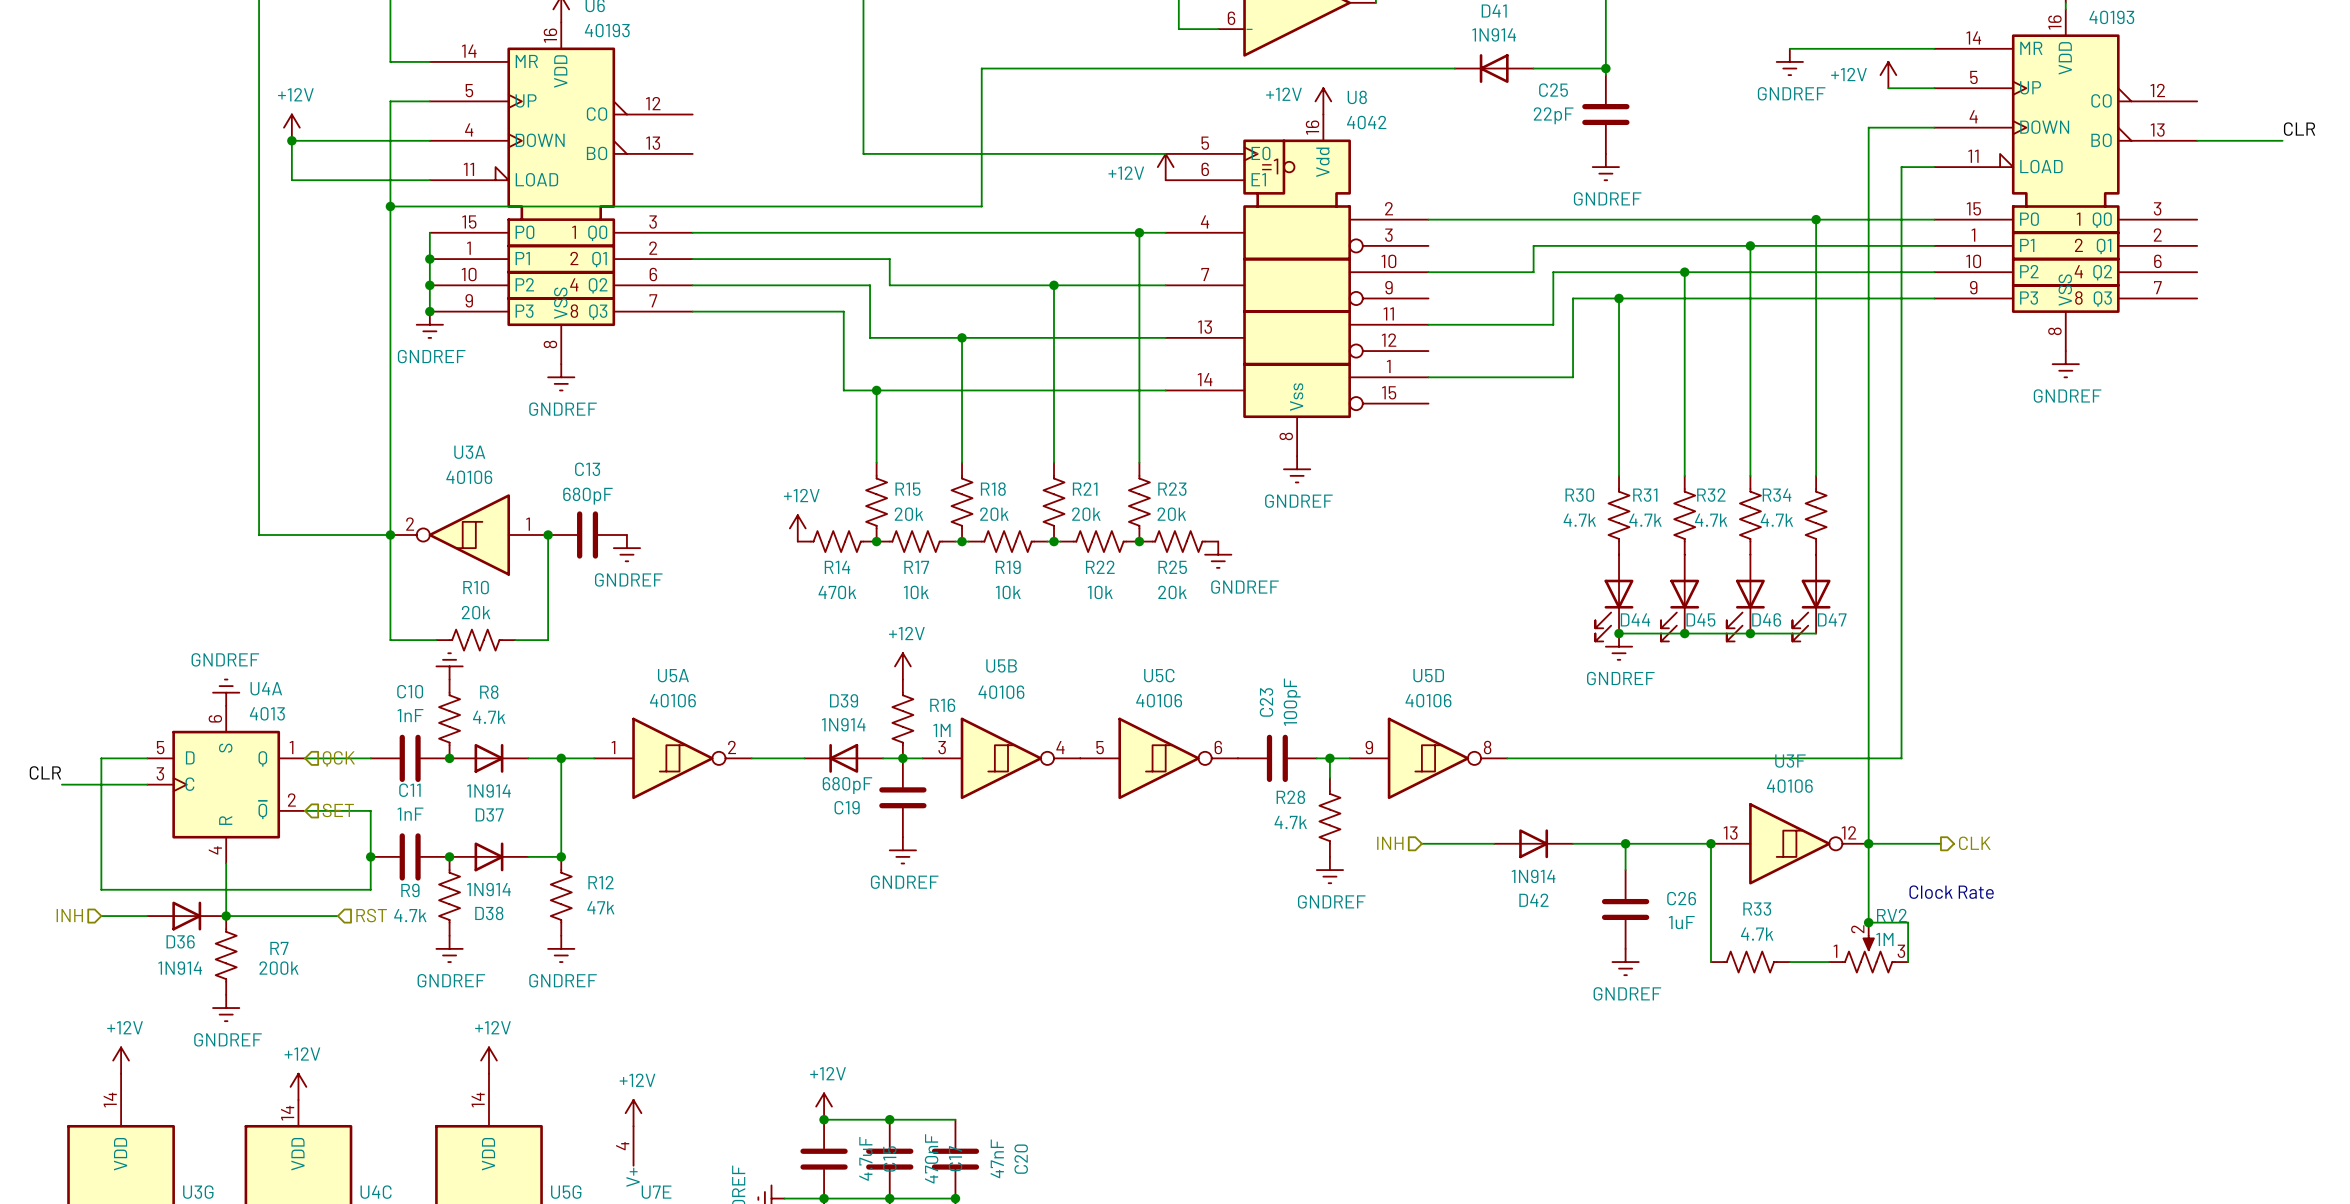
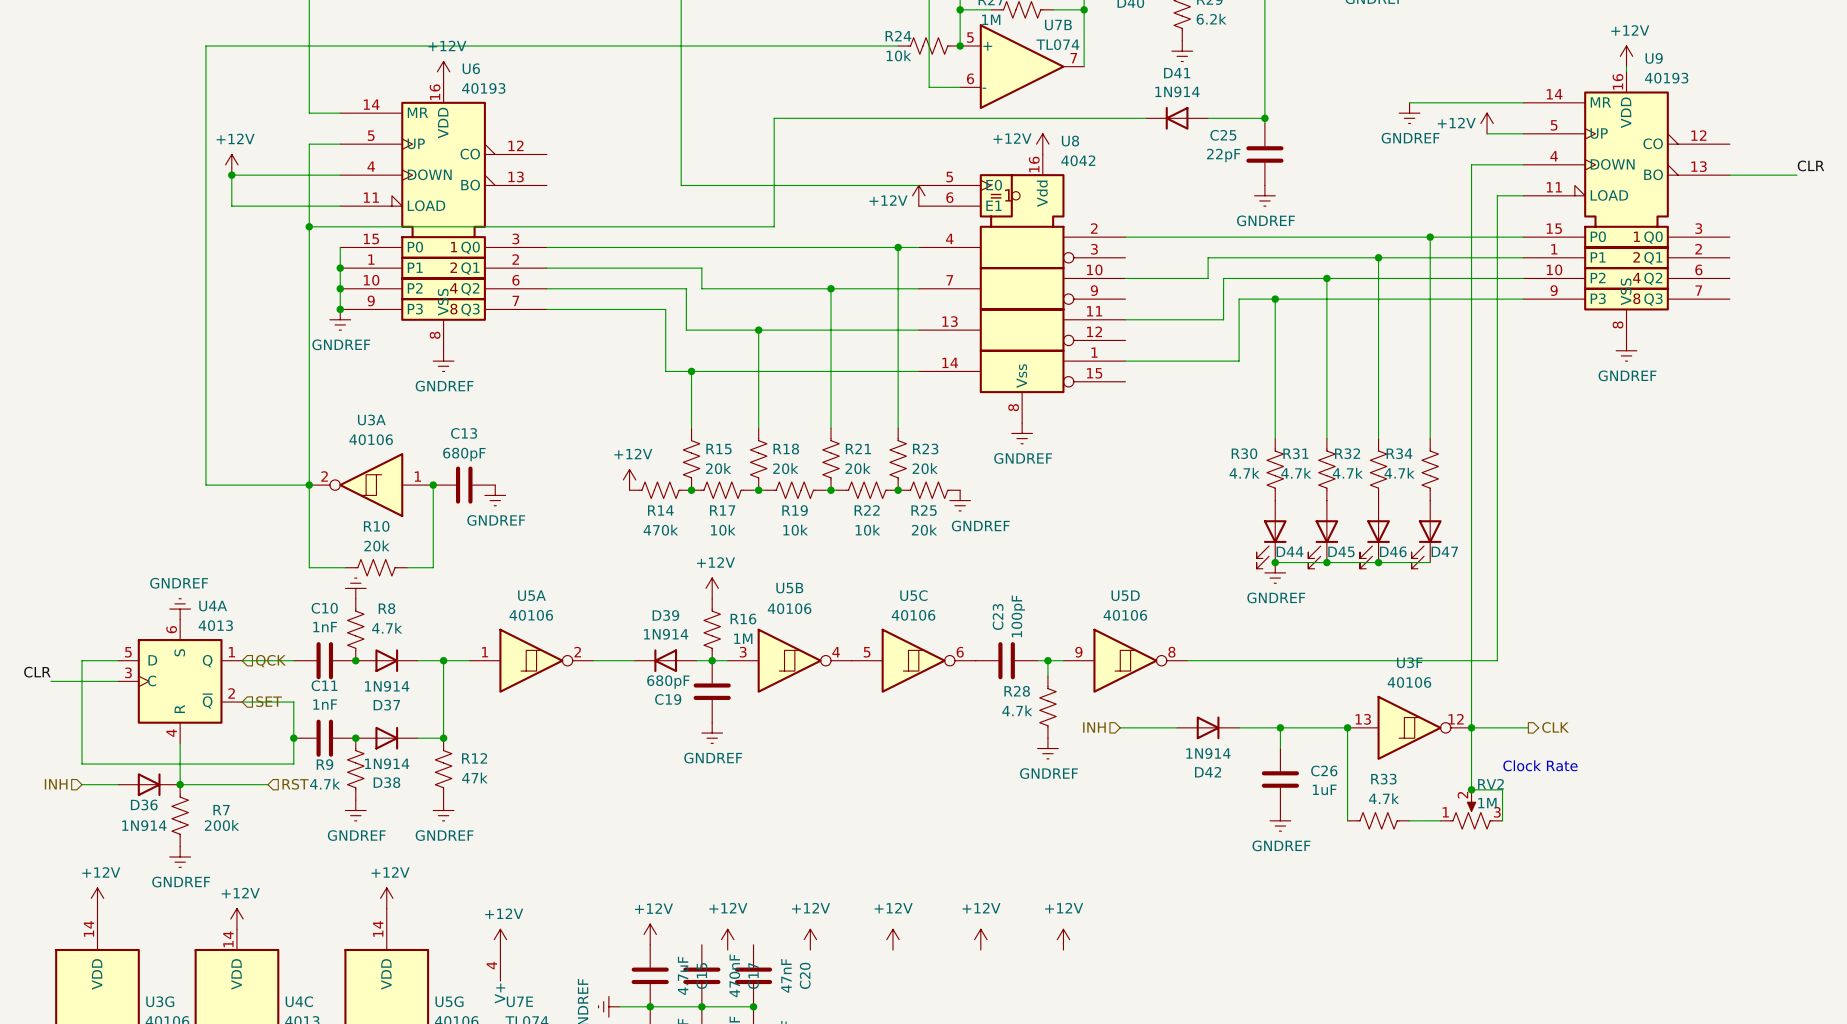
power symbol: none -> +12V (727, 939)
power symbol: none -> +12V (810, 939)
power symbol: none -> +12V (892, 939)
power symbol: none -> +12V (980, 939)
power symbol: none -> +12V (1063, 939)
wire: (824, 1119) (955, 1119) -> none
junction: (824, 1119) -> none
junction: (889, 1119) -> none

